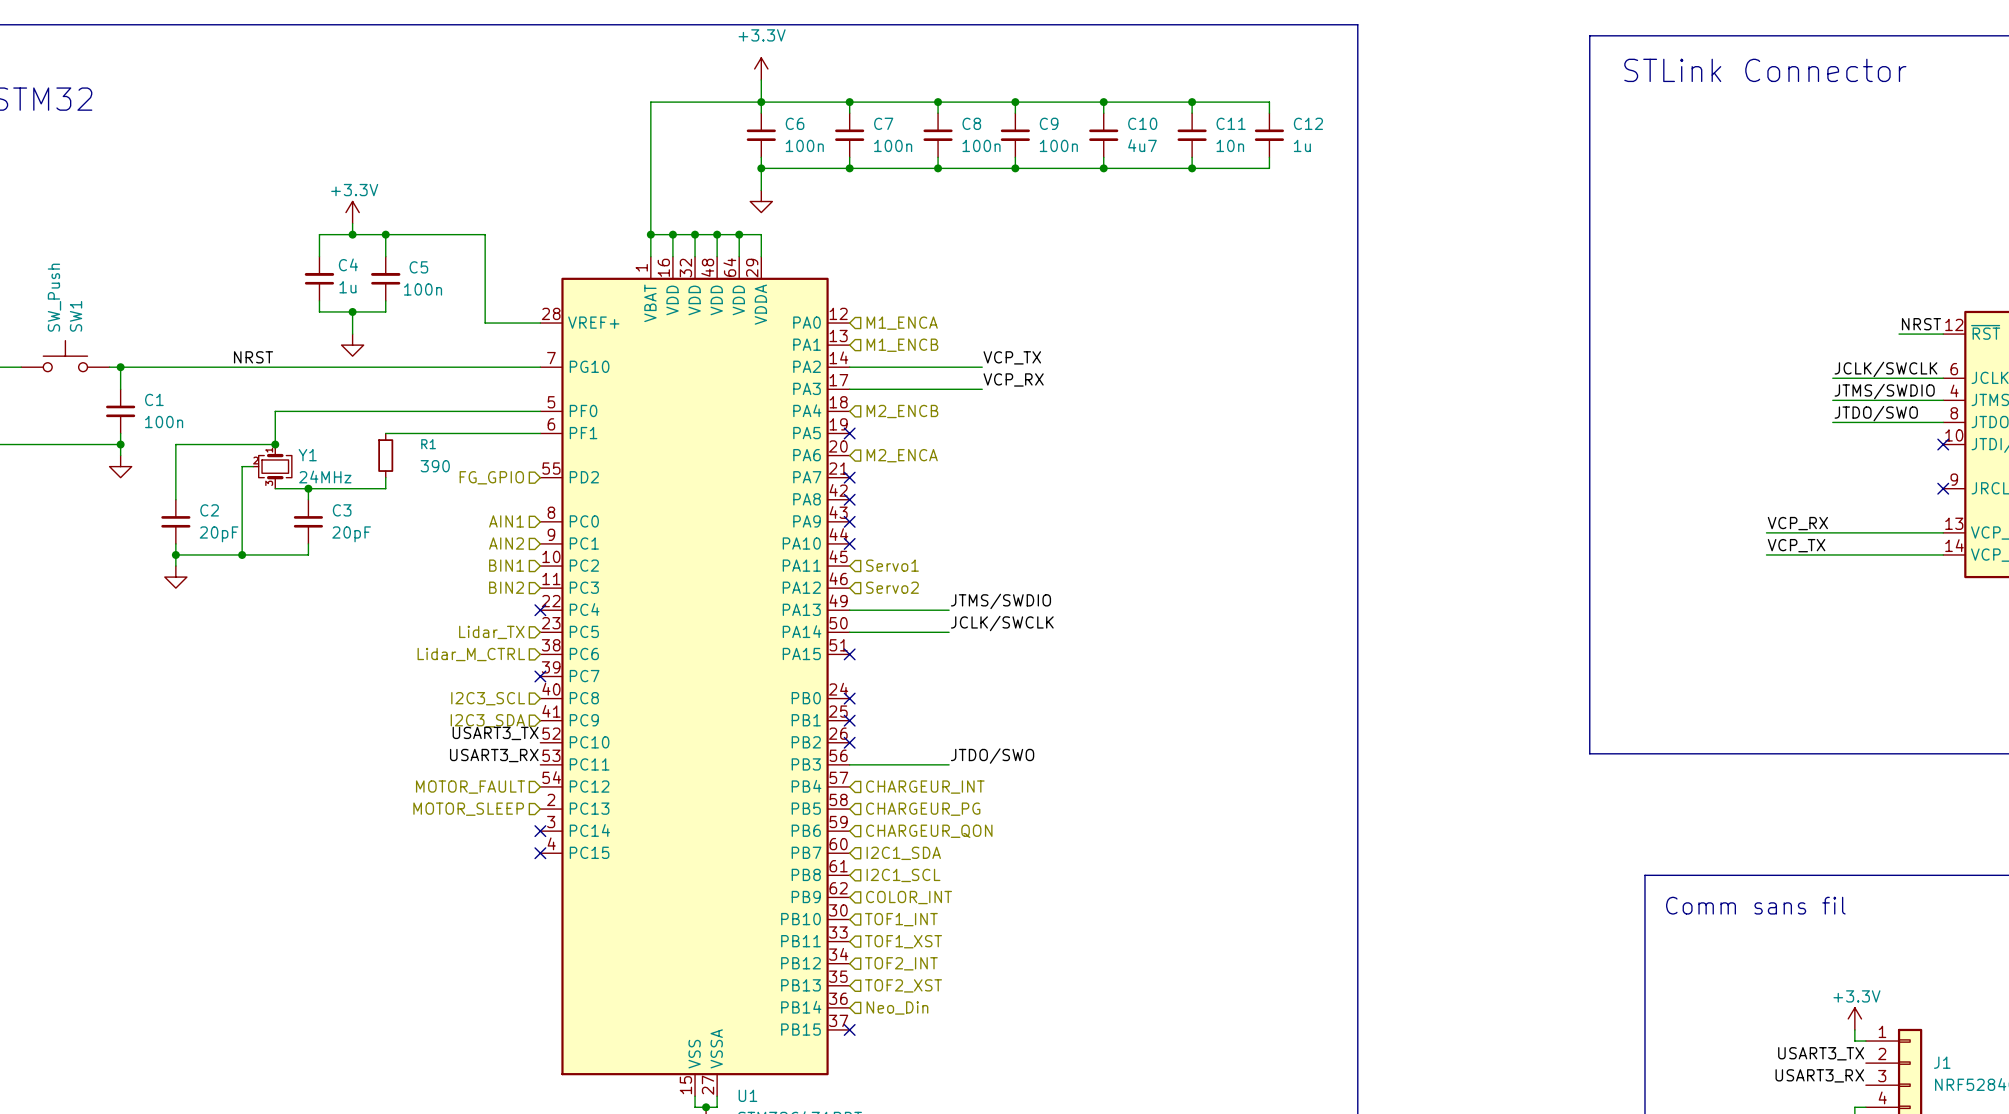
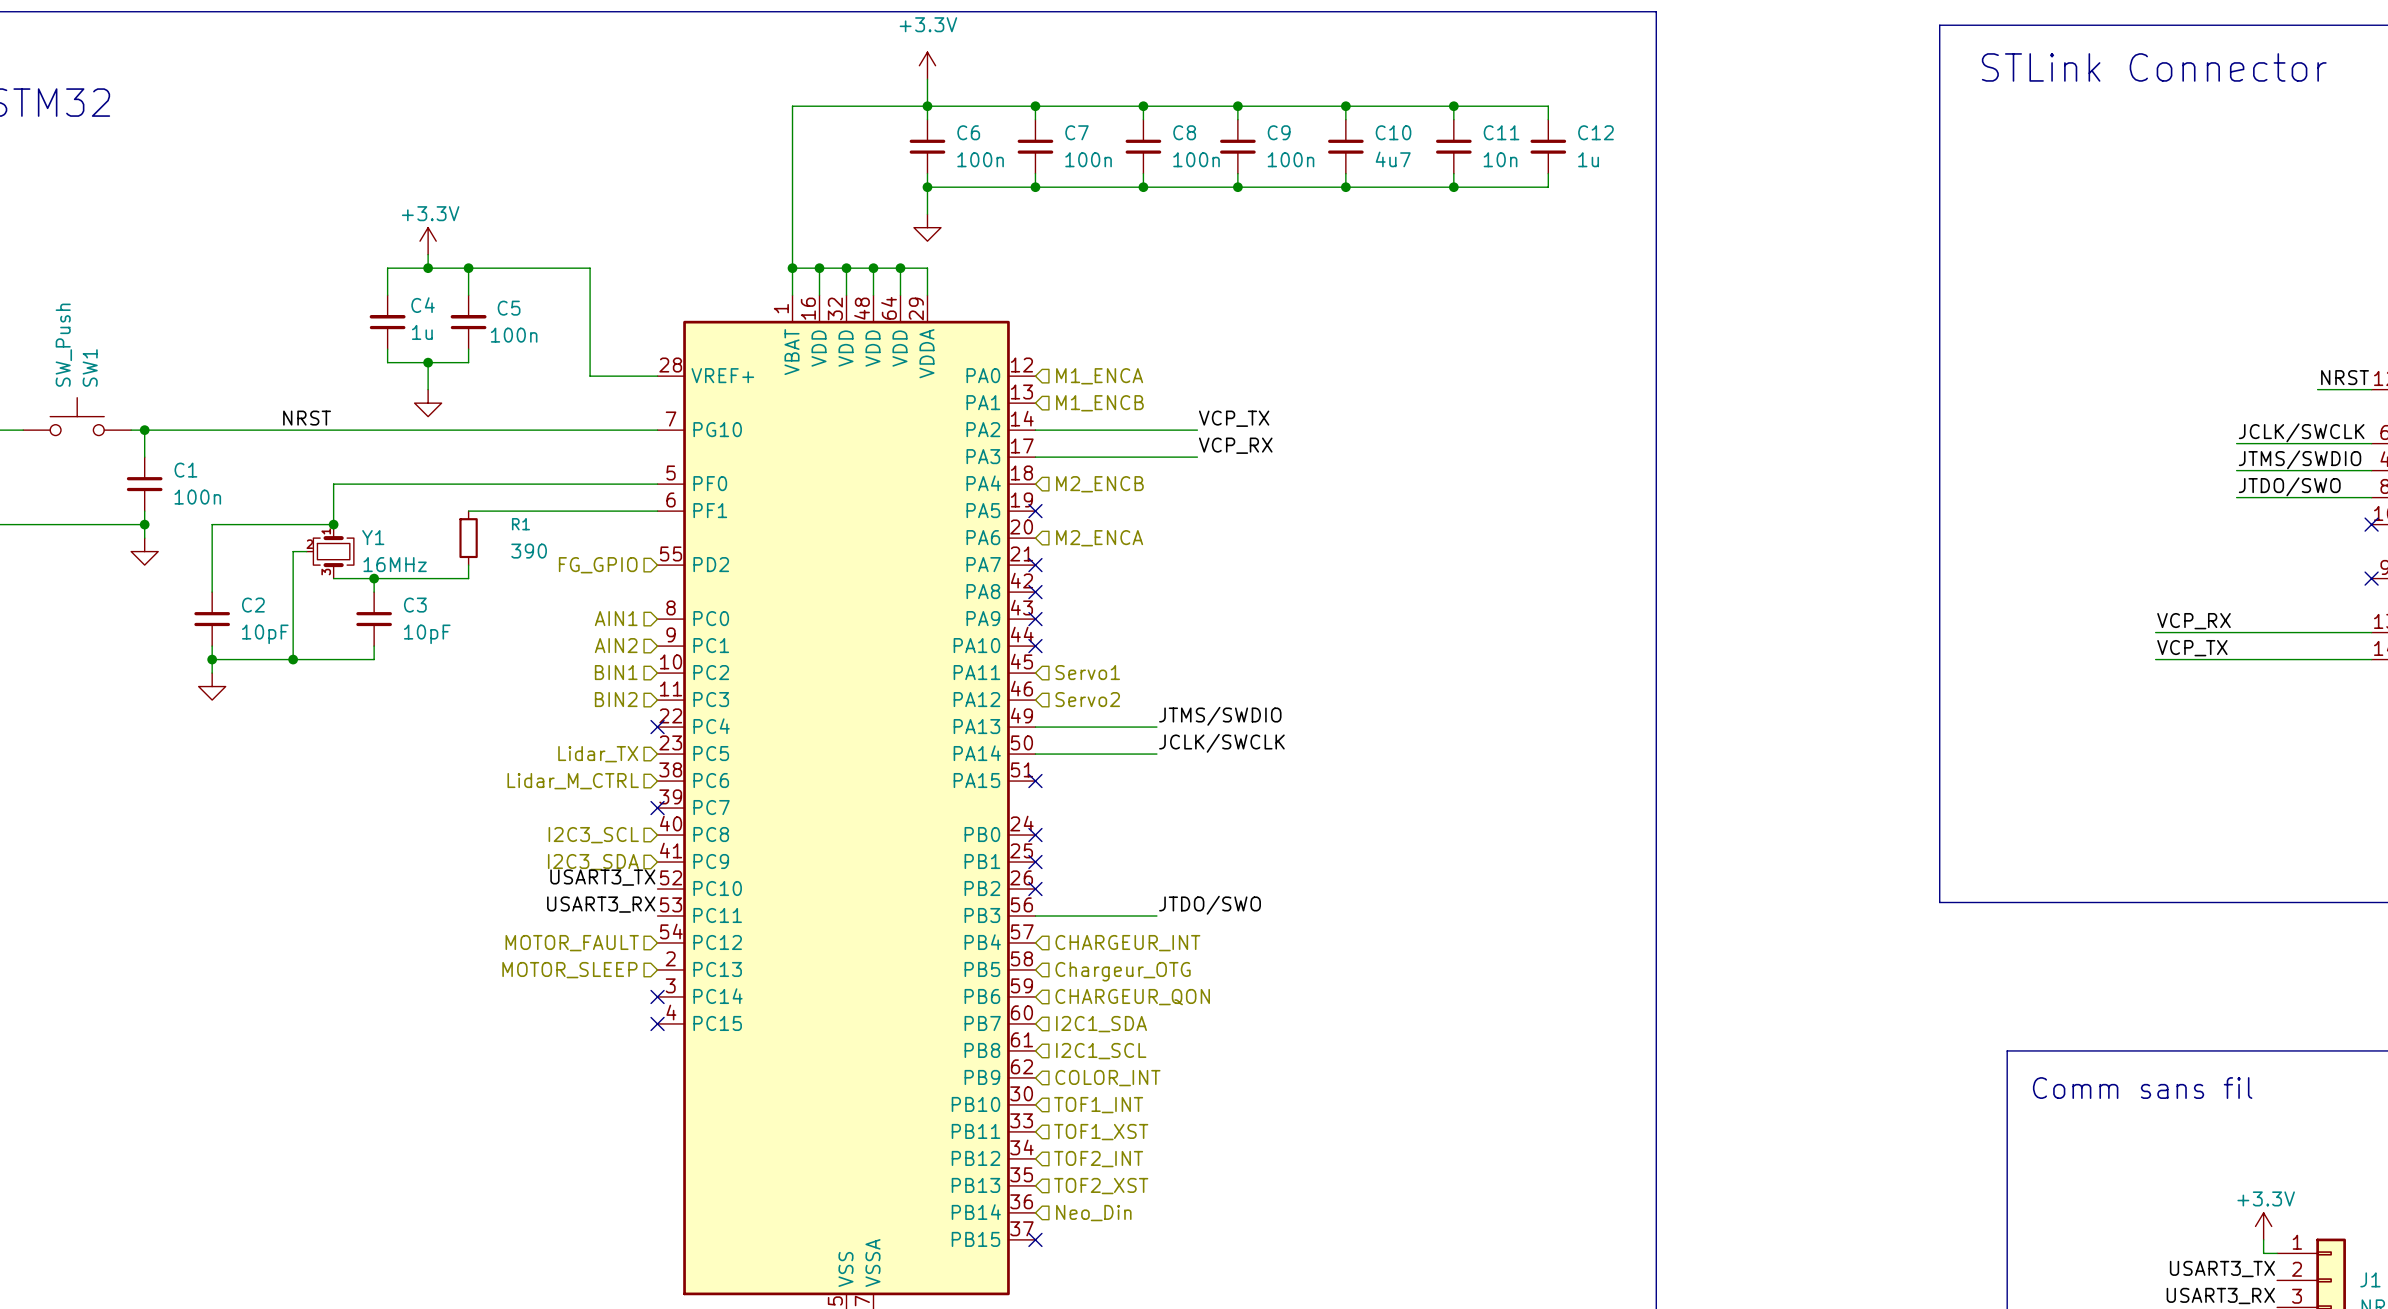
Y1 value: 24MHz (325, 476) -> 16MHz (395, 564)
C2 value: 20pF (219, 534) -> 10pF (265, 634)
C3 value: 20pF (351, 534) -> 10pF (427, 634)
hierarchical label: CHARGEUR_PG (923, 809) -> Chargeur_OTG (1123, 971)

